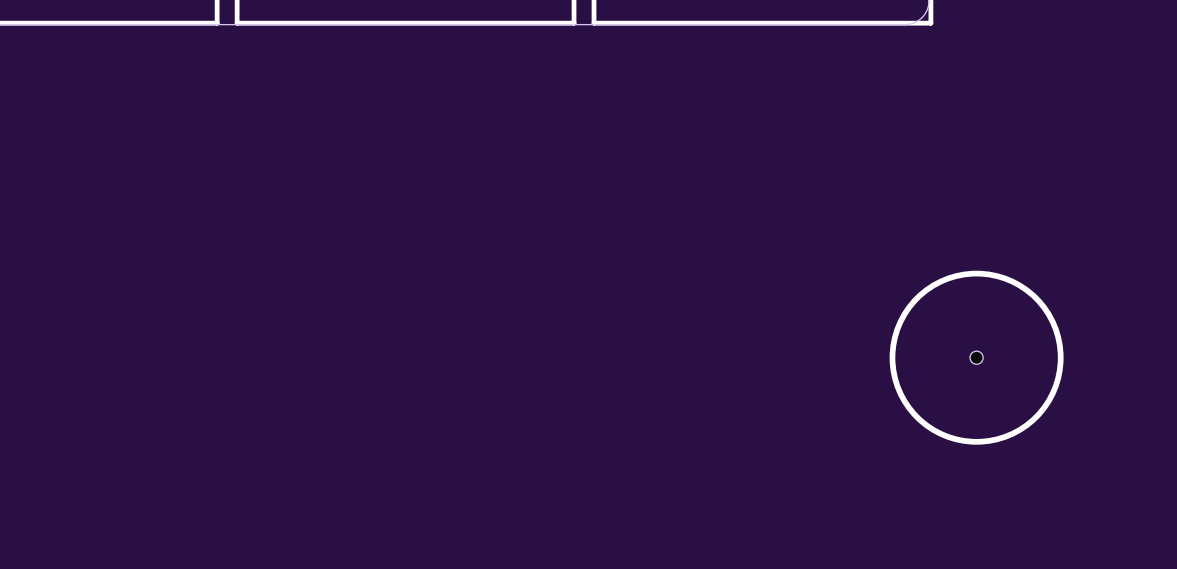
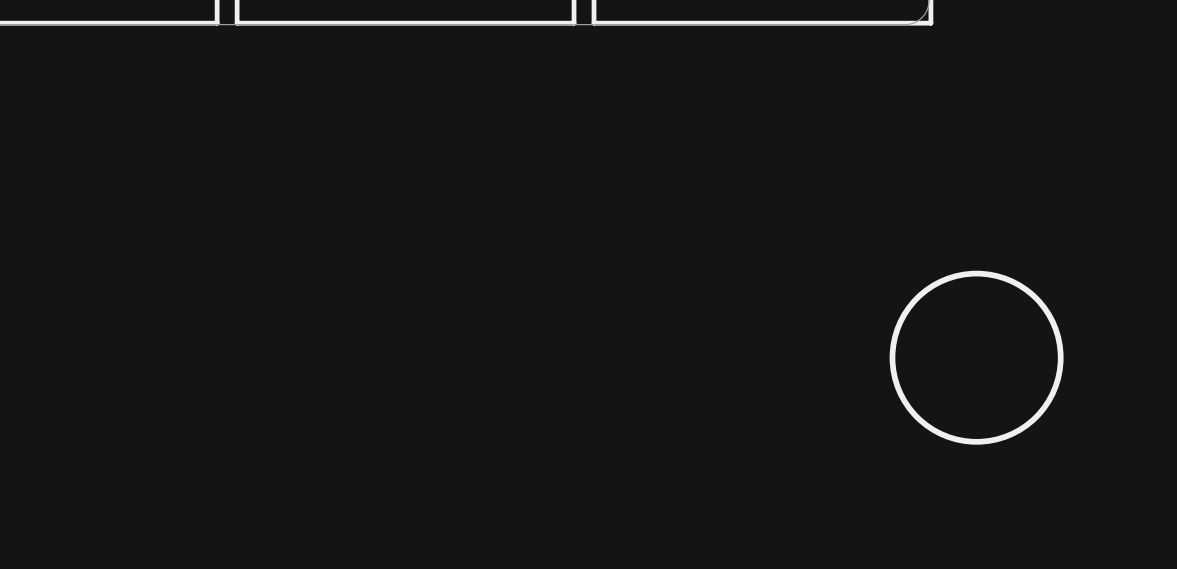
hole: (976, 357) -> none

